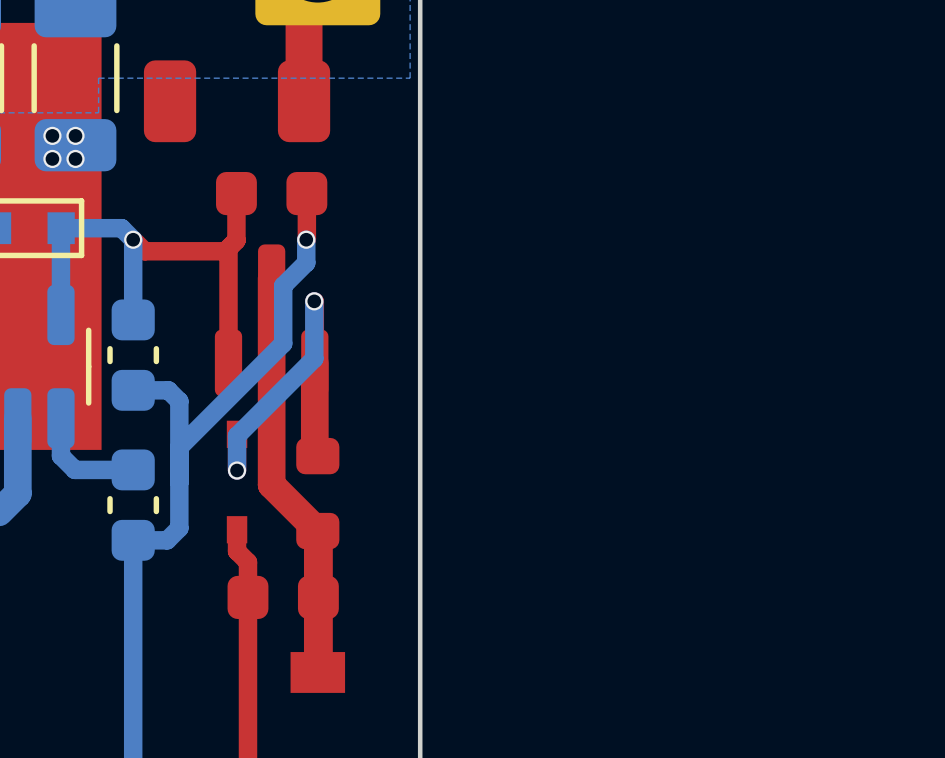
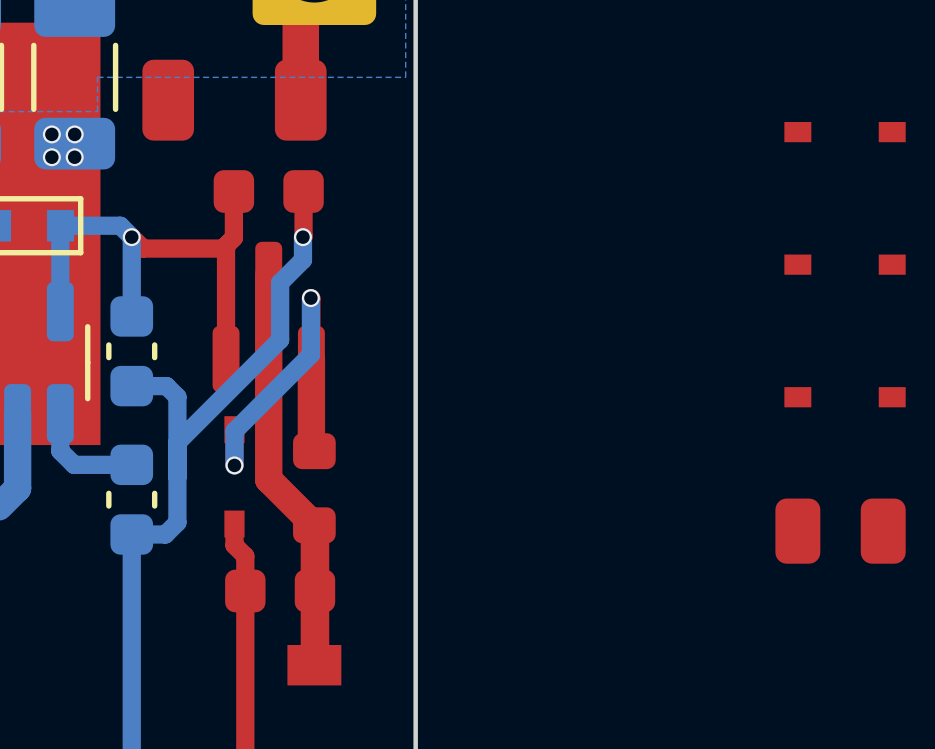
part: none -> (845, 132)
part: none -> (845, 264)
part: none -> (845, 397)
part: none -> (840, 531)

